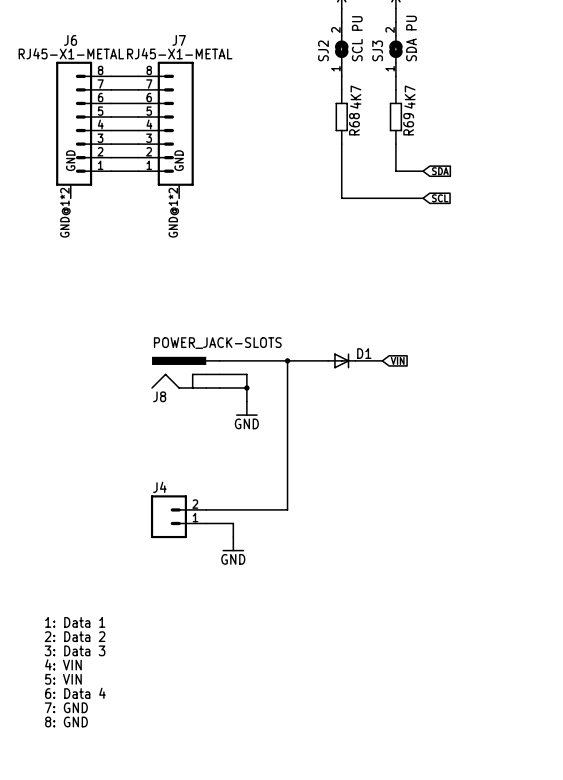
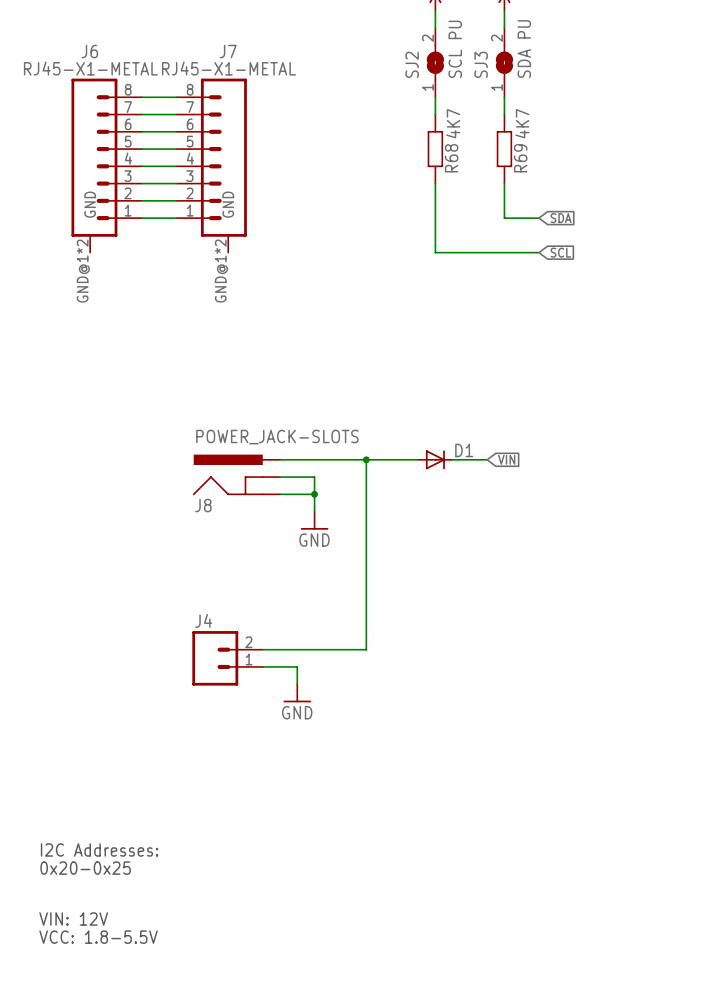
text: 1: Data 1 (75, 622) -> none
text: 2: Data 2 (75, 636) -> none
text: 3: Data 3 (75, 650) -> none
text: 4: VIN (63, 664) -> none
text: none -> I2C Addresses: (99, 849)
text: 5: VIN (63, 679) -> none
text: none -> 0x20-0x25 (85, 868)
text: 6: Data 4 (75, 693) -> none
text: 7: GND (66, 707) -> none
text: none -> VIN: 12V (73, 919)
text: 8: GND (66, 721) -> none
text: none -> VCC: 1.8-5.5V (98, 937)

